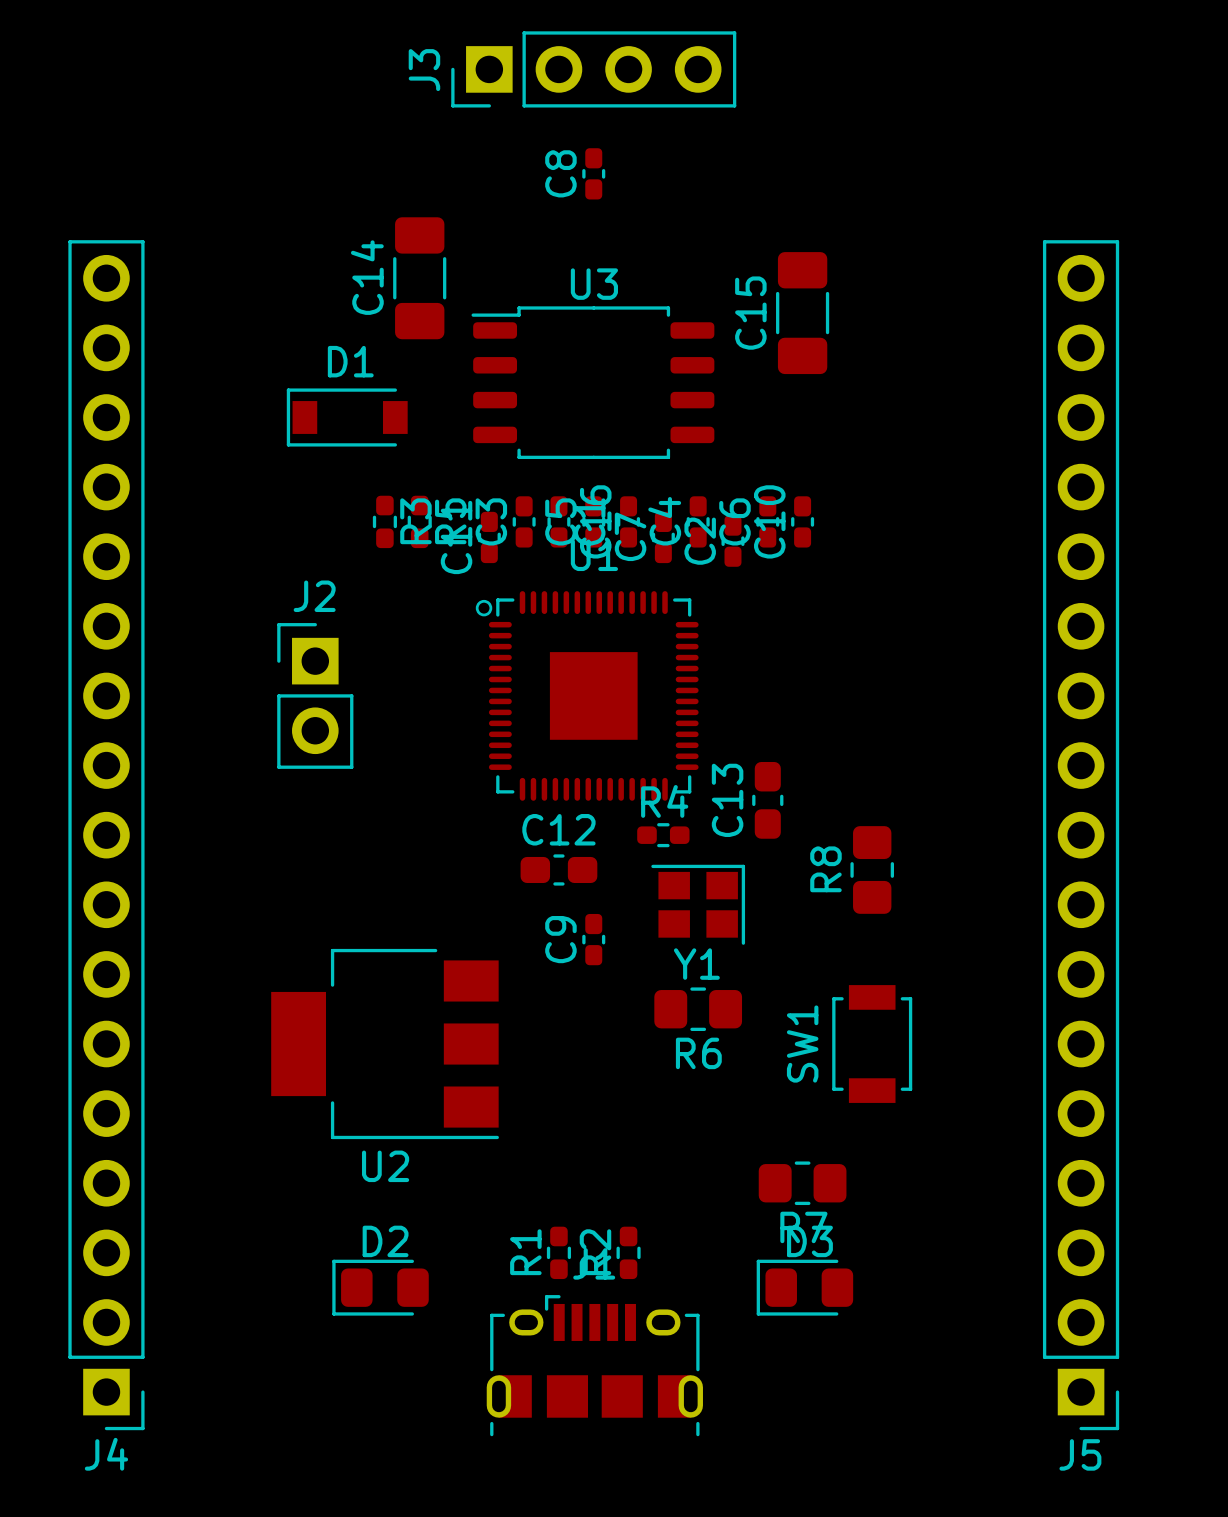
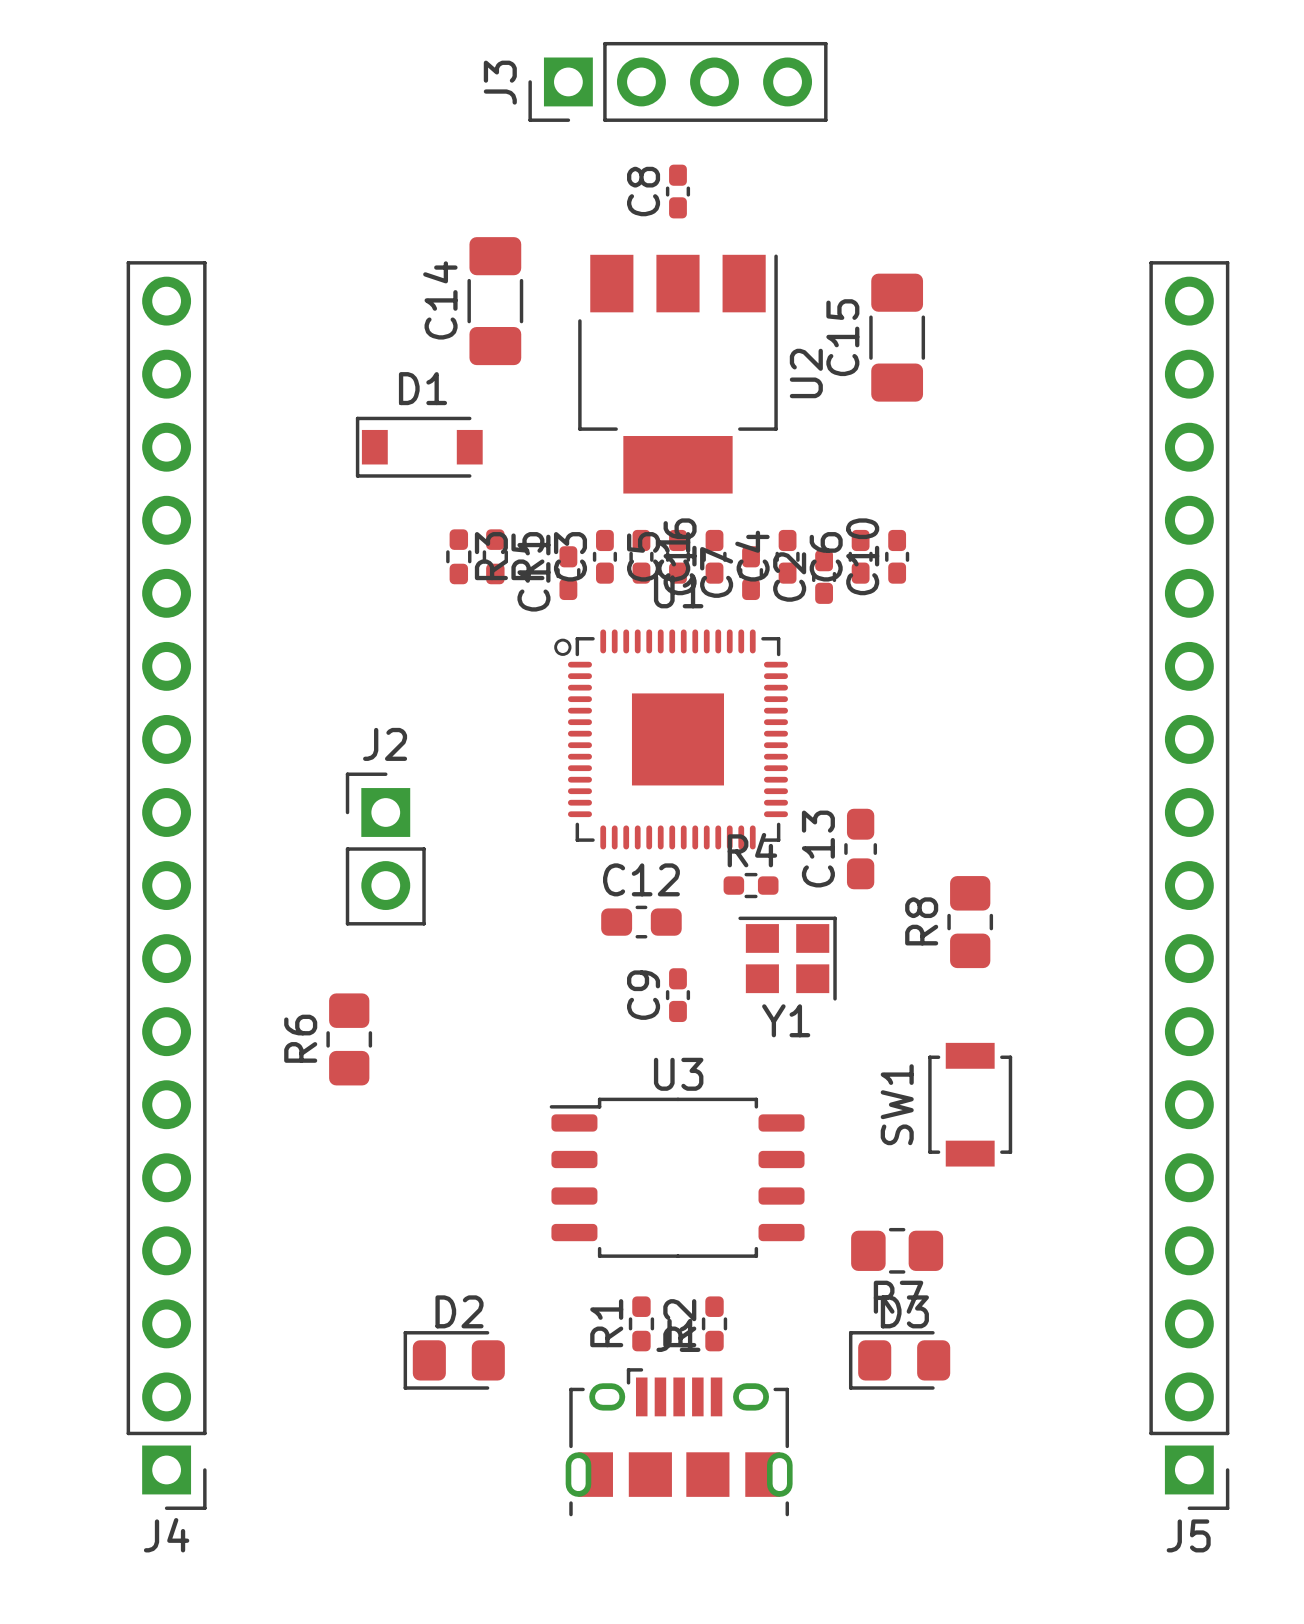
U3 position: (592, 382) -> (677, 1177)
J2 position: (315, 695) -> (385, 849)
R6 rotation: 0° (698, 1009) -> 90° clockwise (349, 1039)
R6 position: (698, 1009) -> (349, 1039)
U2 rotation: 0° (385, 1044) -> 90° counterclockwise (677, 374)
U2 position: (385, 1044) -> (677, 374)

